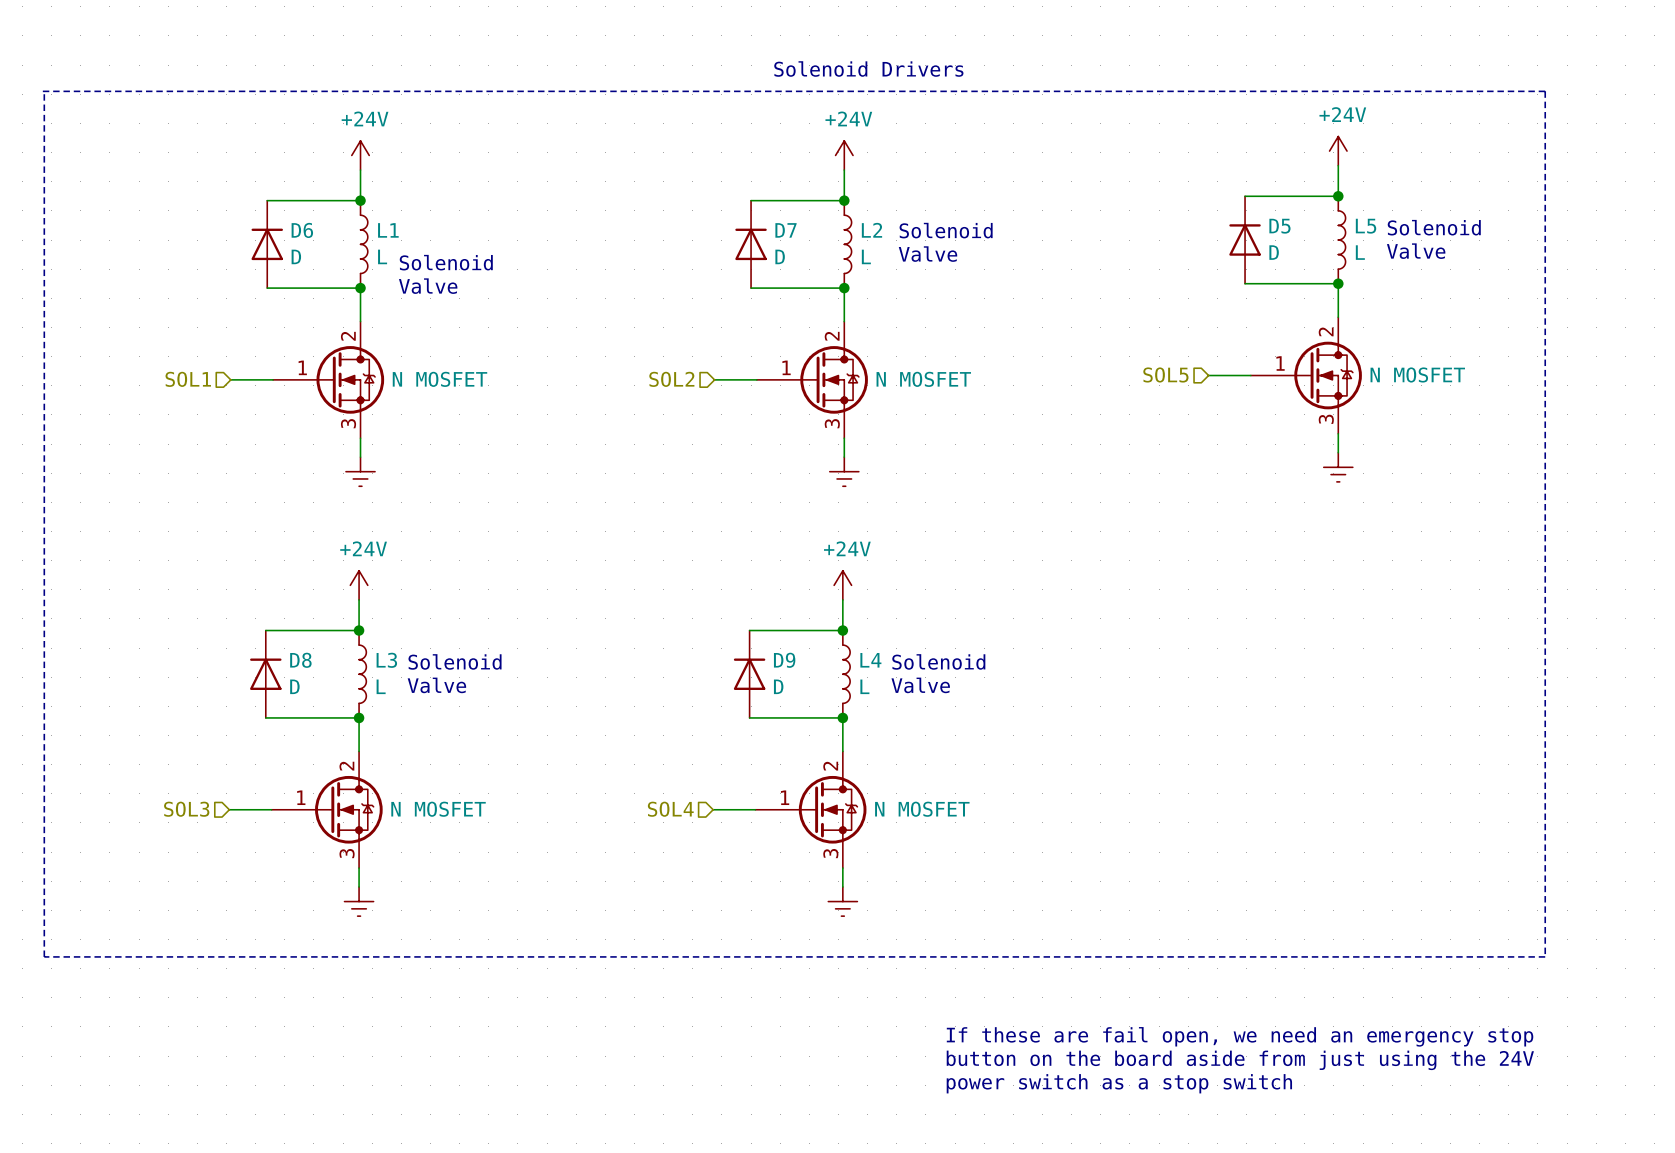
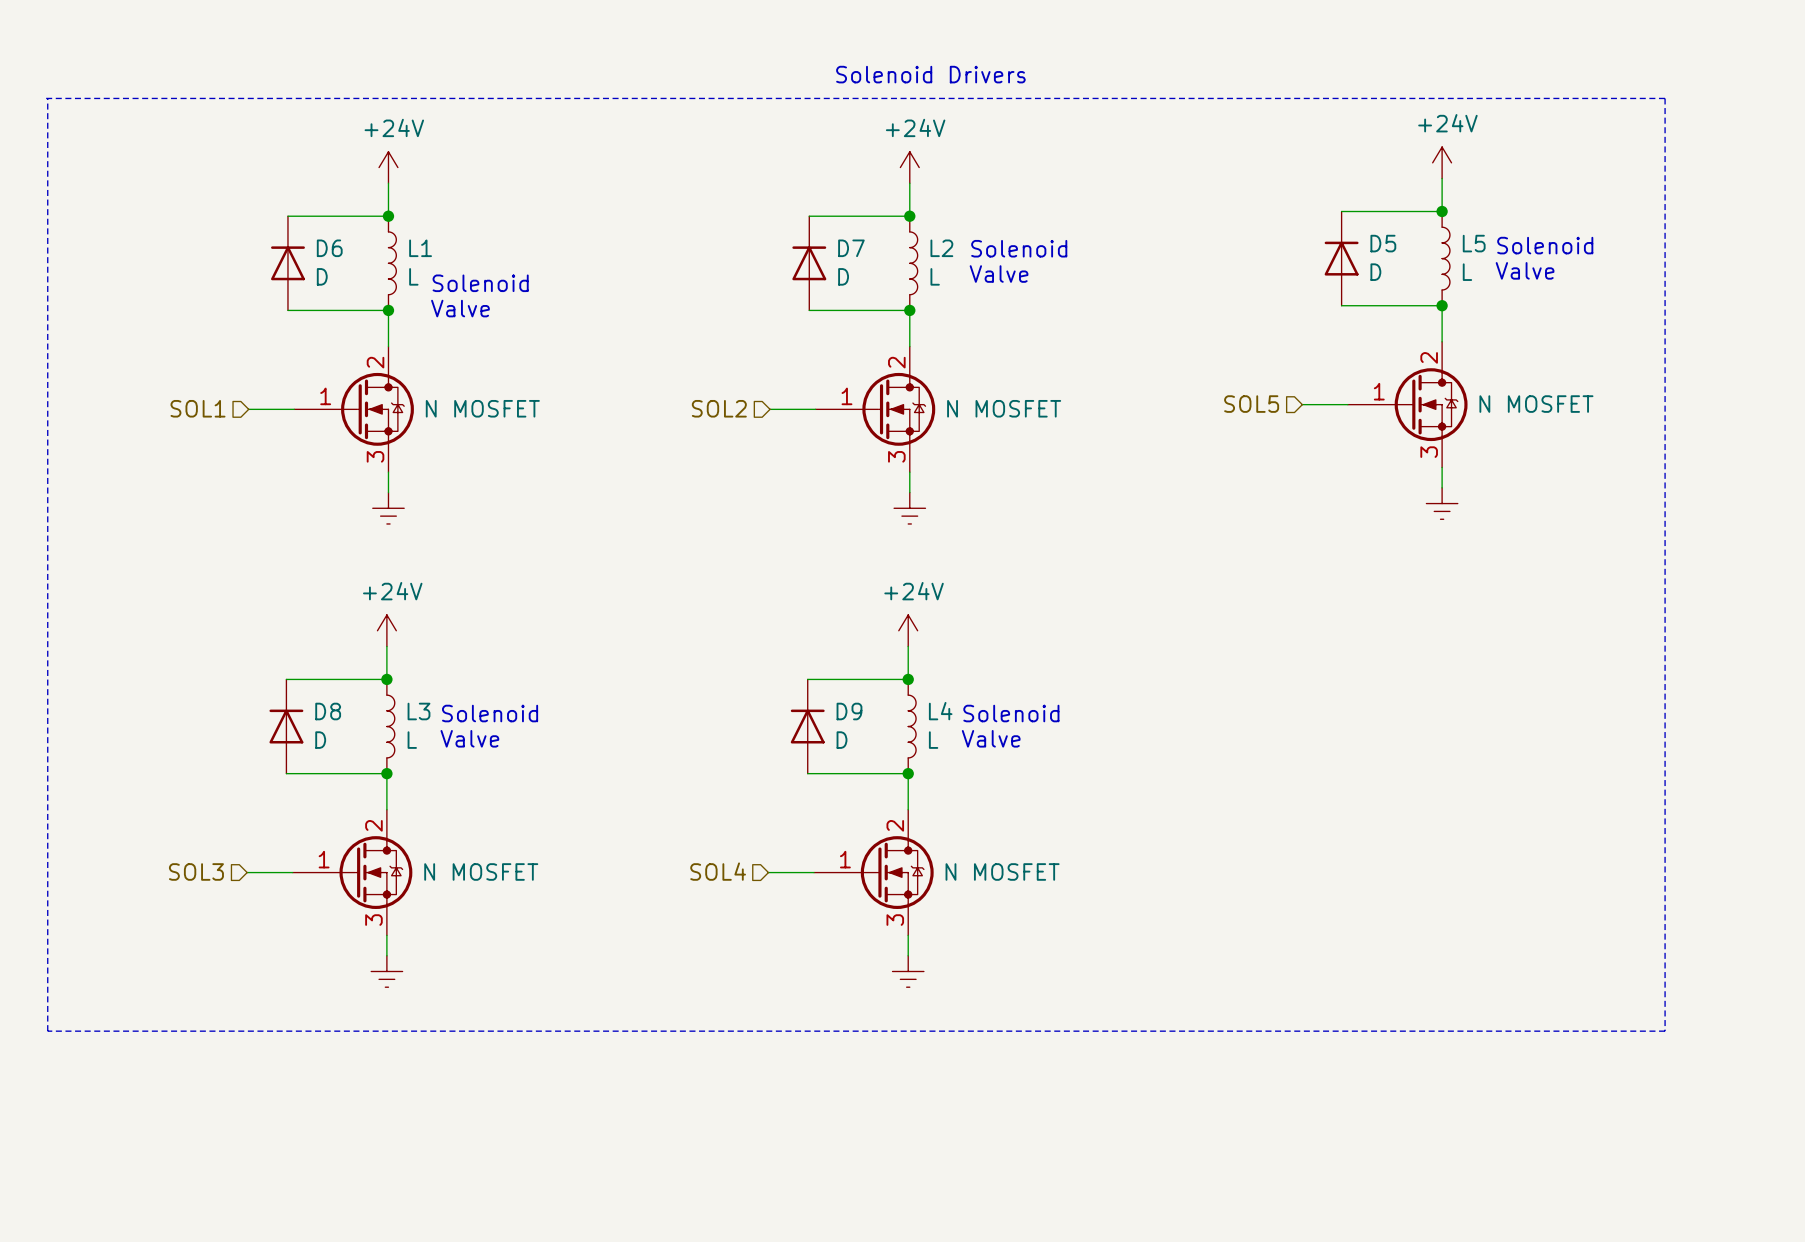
text: If these are fail open, we need an emergency stop (1240, 1036) -> none
text: button on the board aside from just using the 24V (1240, 1060) -> none
text: power switch as a stop switch (1119, 1083) -> none

